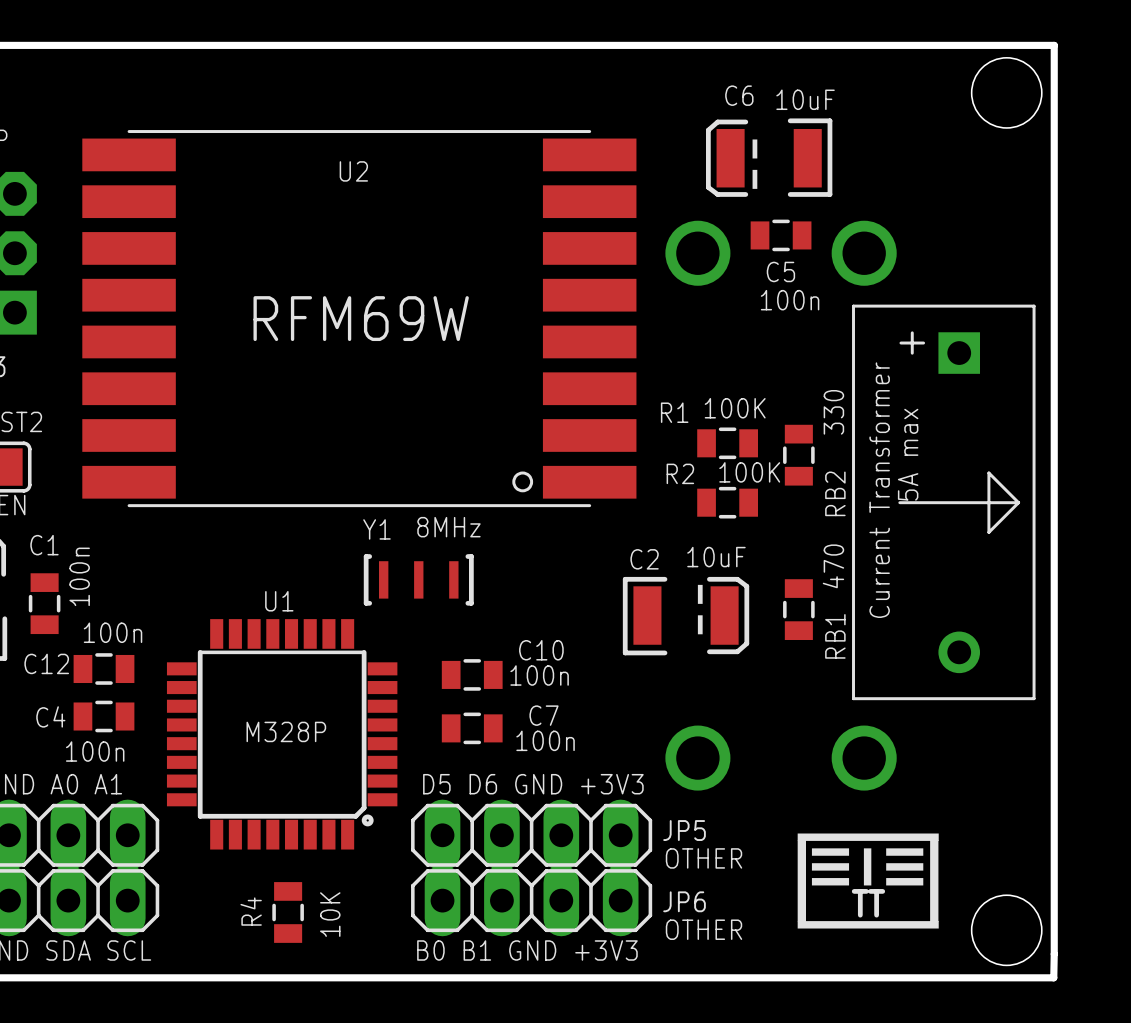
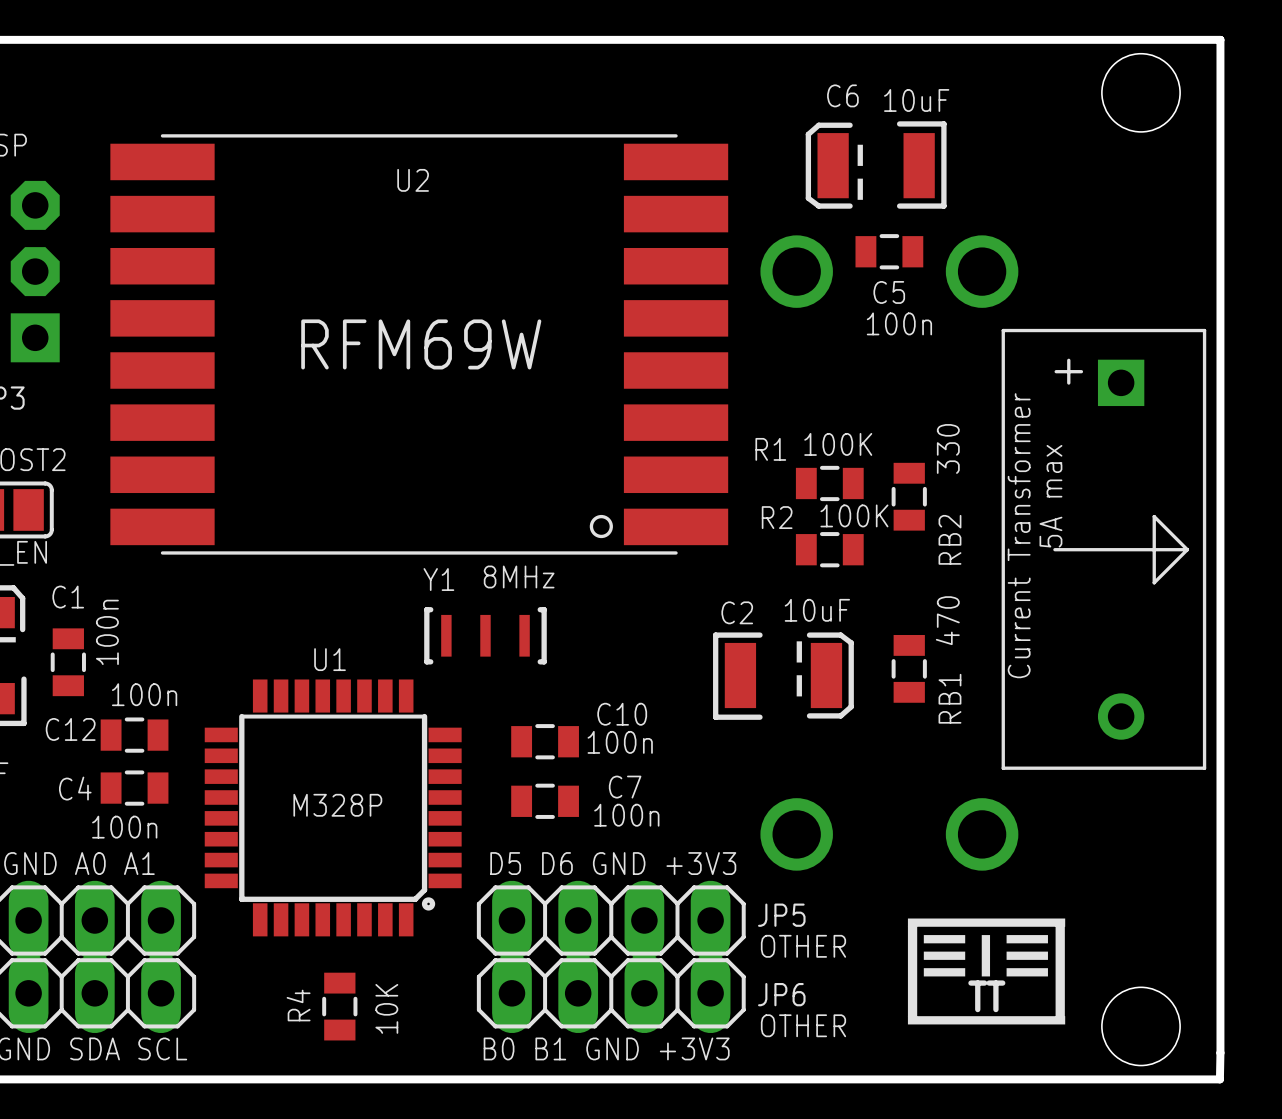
board edge: (1054, 45) (1053, 977) (1053, 47) -> (1193, 39) (1220, 39) (1219, 1079)
text position: 5A max (908, 454) -> 5A max (1050, 496)
text position: Current Transformer (879, 490) -> Current Transformer (1019, 535)
part position: (943, 502) -> (1103, 549)
board edge: none -> (1193, 1079) (1219, 1079)

